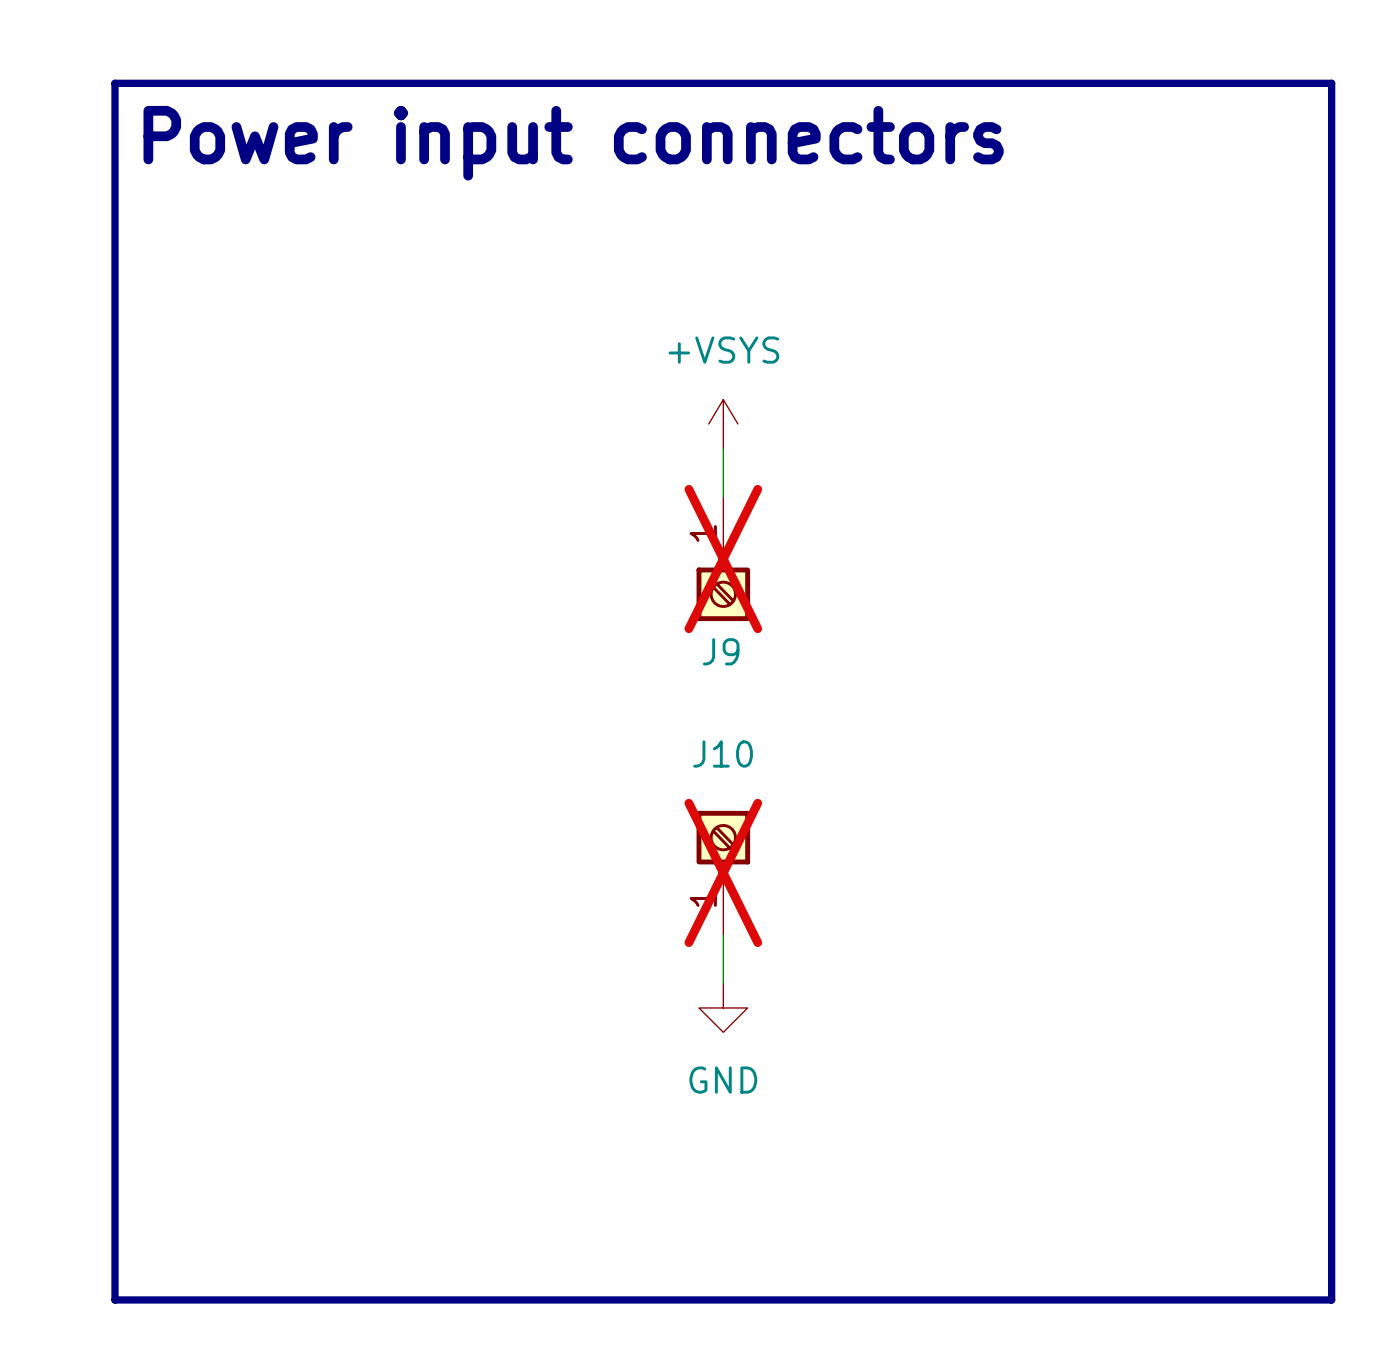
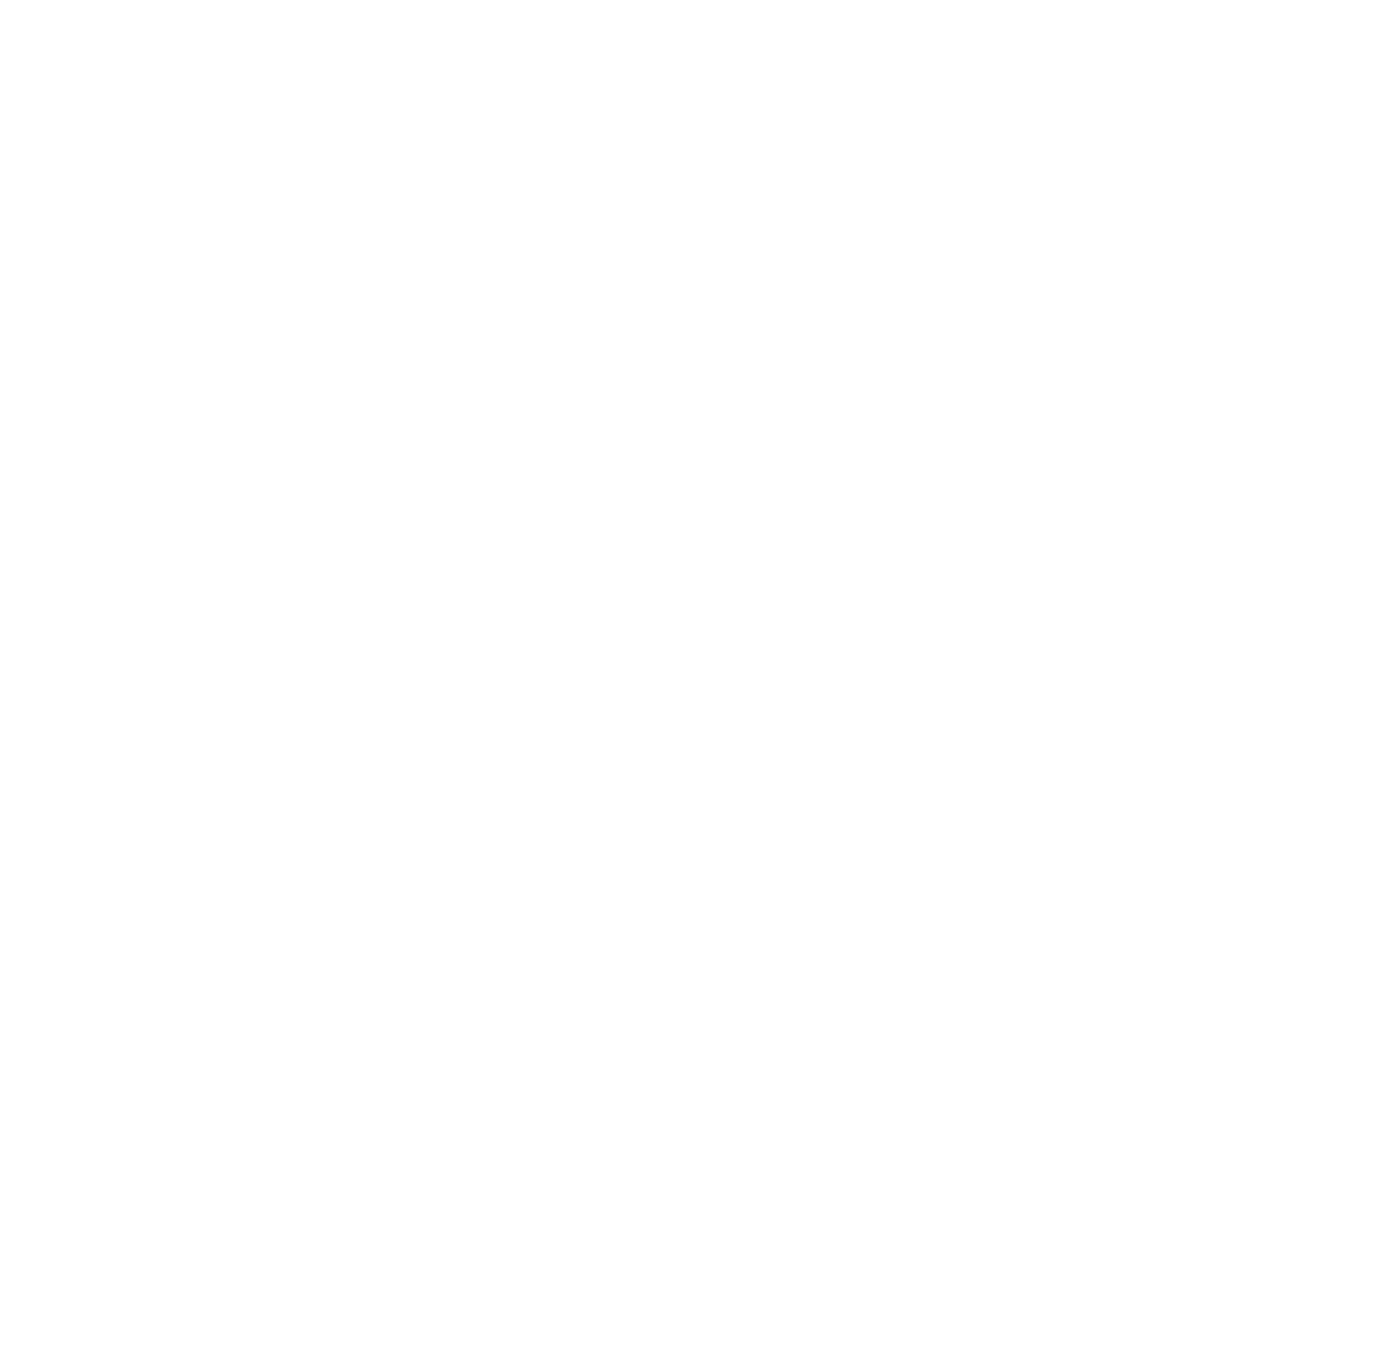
line: (115, 83) (1331, 83) (1331, 1299) (115, 1299) (115, 83) -> none
text: Power input connectors (573, 143) -> none
power symbol: +VSYS (723, 423) -> none
wire: (723, 448) (723, 496) -> none
J9: (723, 559) -> none
J10: (723, 872) -> none
wire: (723, 934) (723, 983) -> none
power symbol: GND (723, 1007) -> none

